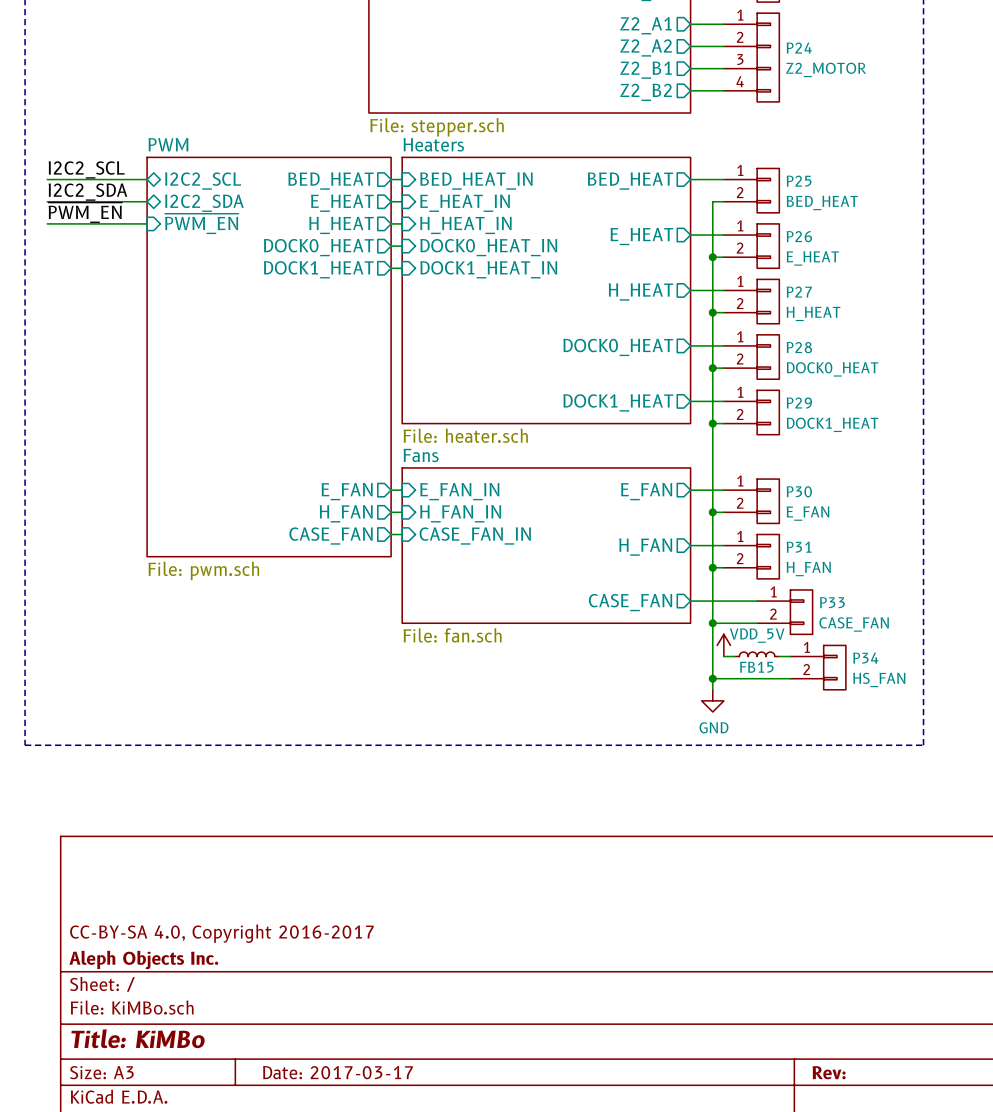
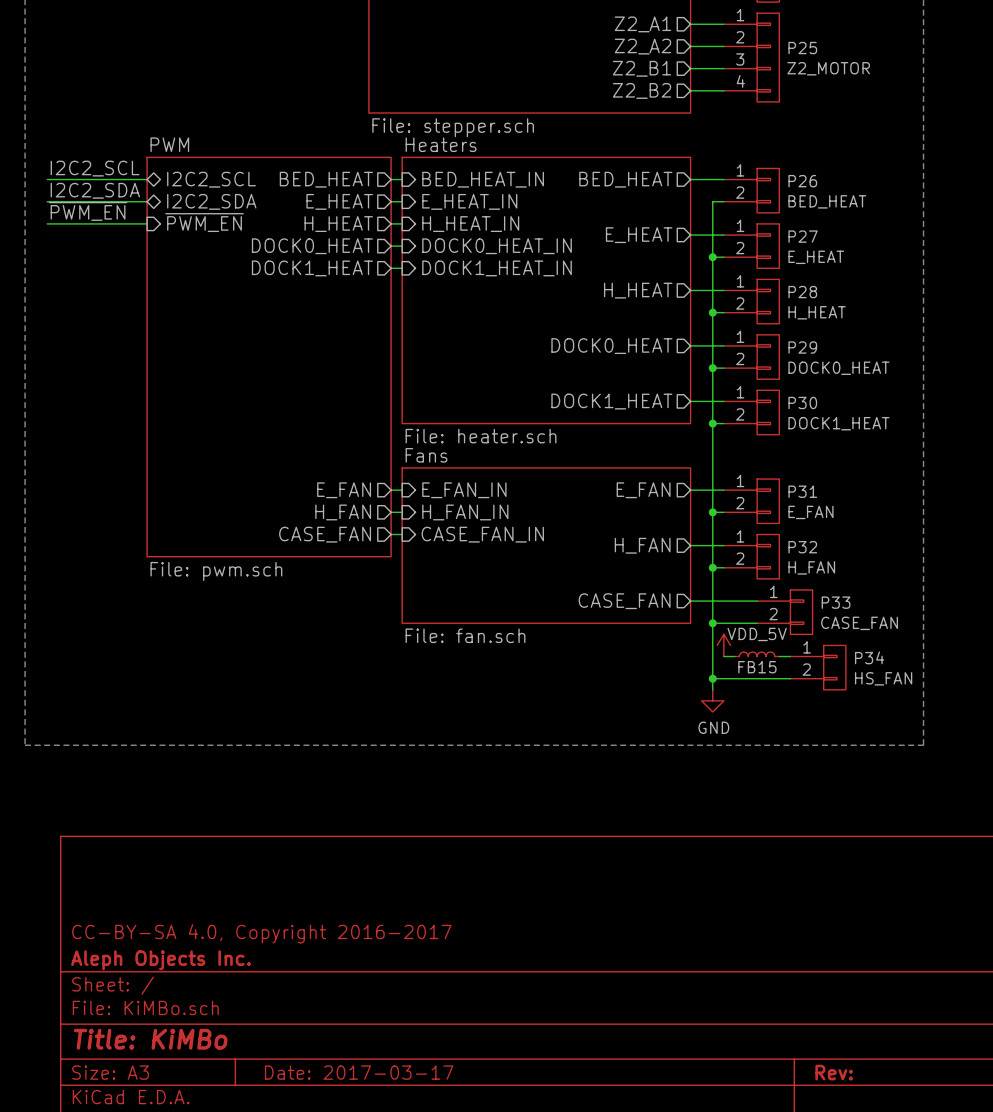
P24 name: P24 (799, 48) -> P25 (802, 48)
P25 name: P25 (799, 181) -> P26 (802, 181)
P26 name: P26 (799, 236) -> P27 (803, 236)
P27 name: P27 (799, 292) -> P28 (802, 292)
P28 name: P28 (799, 347) -> P29 (802, 347)
P29 name: P29 (799, 403) -> P30 (802, 402)
P30 name: P30 (799, 491) -> P31 (802, 491)
P31 name: P31 (799, 547) -> P32 (802, 547)

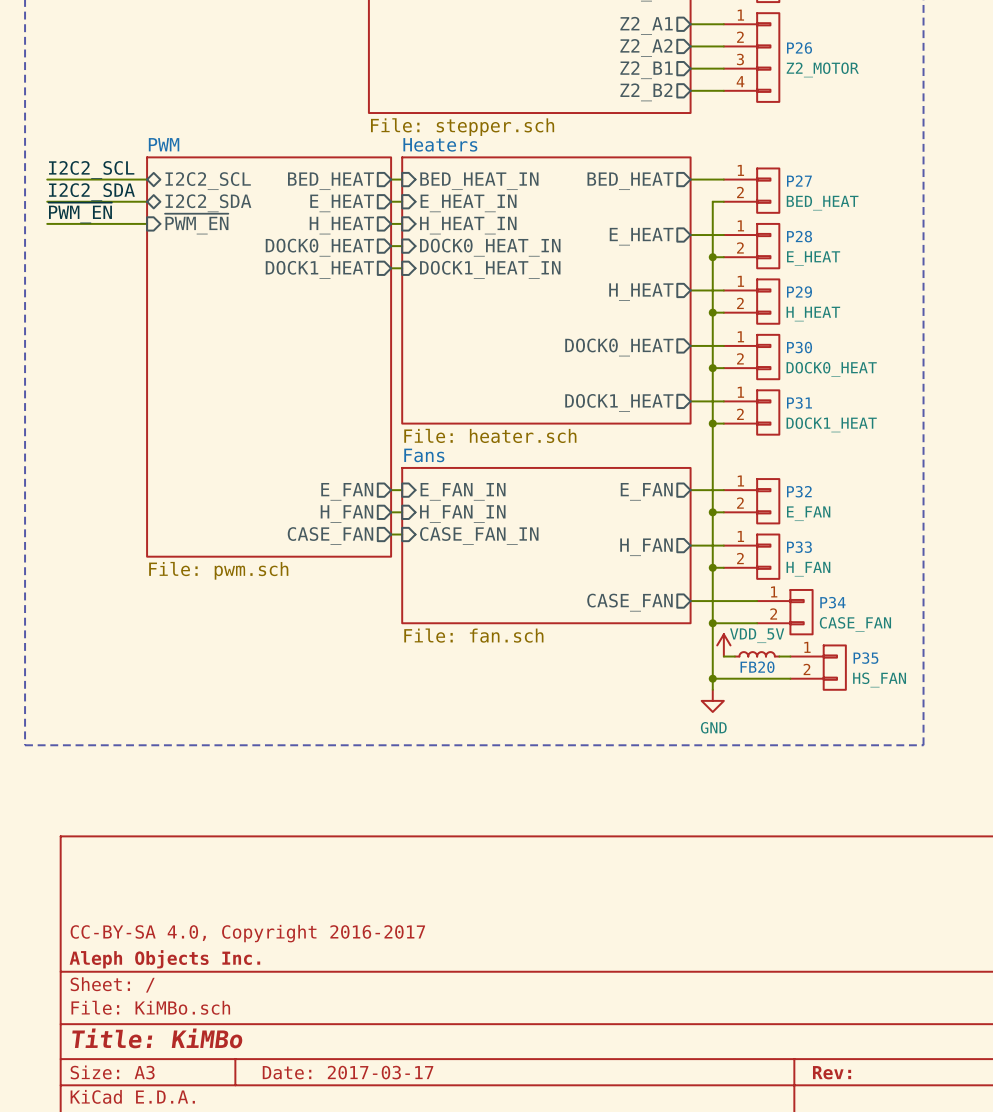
P25 name: P25 (802, 48) -> P26 (799, 48)
P26 name: P26 (802, 181) -> P27 (799, 181)
P27 name: P27 (803, 236) -> P28 (799, 236)
P28 name: P28 (802, 292) -> P29 (799, 292)
P29 name: P29 (802, 347) -> P30 (799, 347)
P30 name: P30 (802, 402) -> P31 (799, 402)
P31 name: P31 (802, 491) -> P32 (799, 491)
P32 name: P32 (802, 547) -> P33 (799, 547)
P33 name: P33 (836, 602) -> P34 (832, 602)
P34 name: P34 (869, 657) -> P35 (865, 658)
FB15 name: FB15 (757, 667) -> FB20 (757, 667)

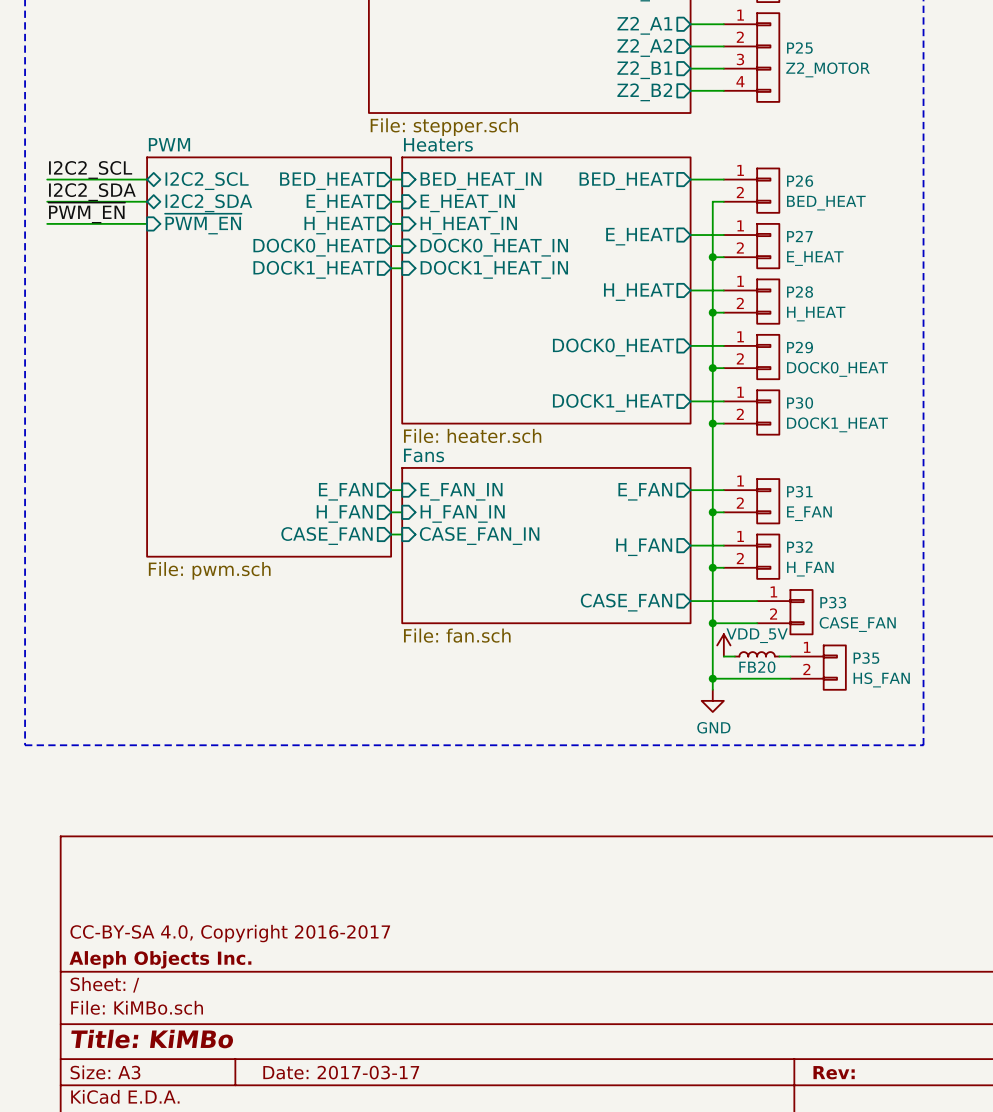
P26 name: P26 (799, 48) -> P25 (799, 48)
P27 name: P27 (799, 181) -> P26 (800, 181)
P28 name: P28 (799, 236) -> P27 (799, 236)
P29 name: P29 (799, 292) -> P28 (800, 292)
P30 name: P30 (799, 347) -> P29 (800, 347)
P31 name: P31 (799, 402) -> P30 (800, 402)
P32 name: P32 (799, 491) -> P31 (799, 491)
P33 name: P33 (799, 547) -> P32 (799, 547)
P34 name: P34 (832, 602) -> P33 (833, 602)

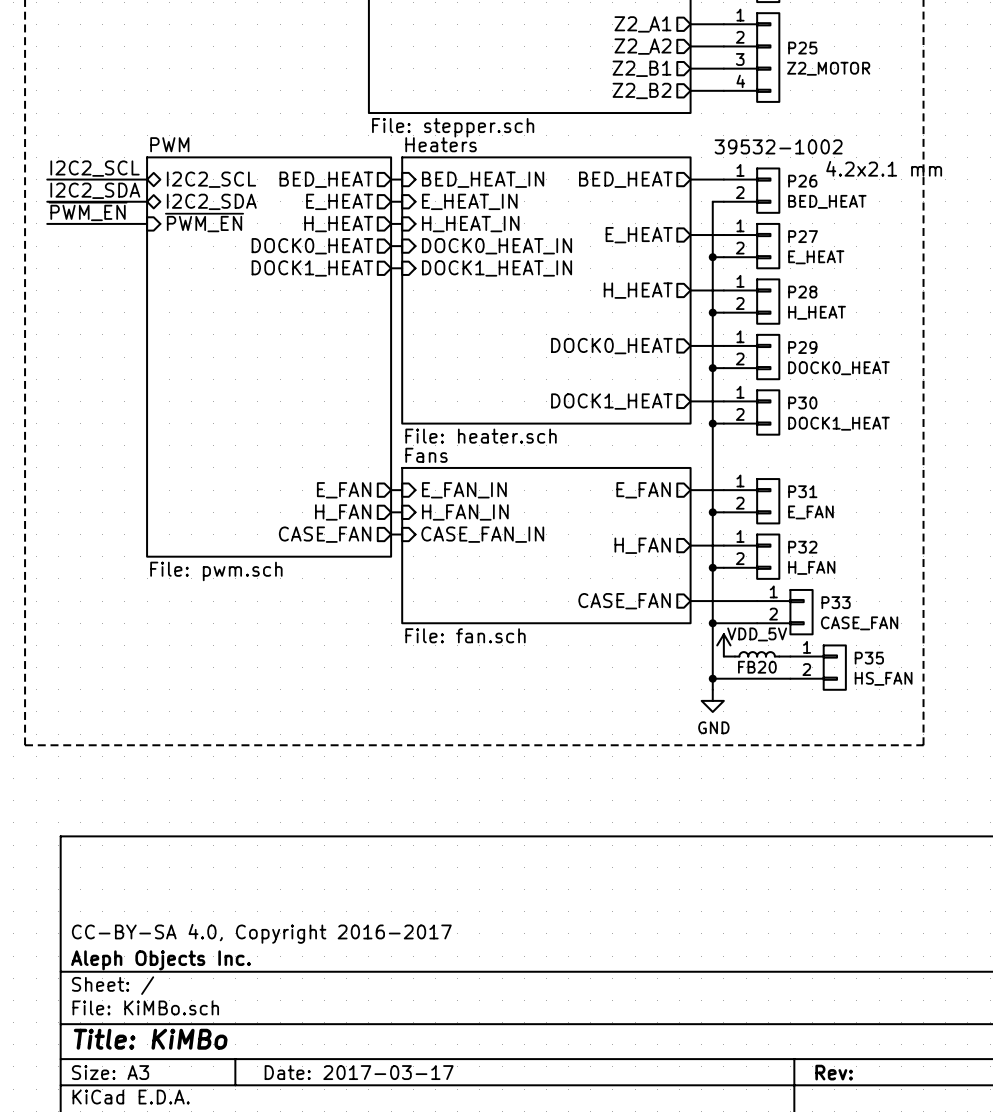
text: none -> 39532-1002 (778, 146)
text: none -> 4.2x2.1 mm (884, 168)

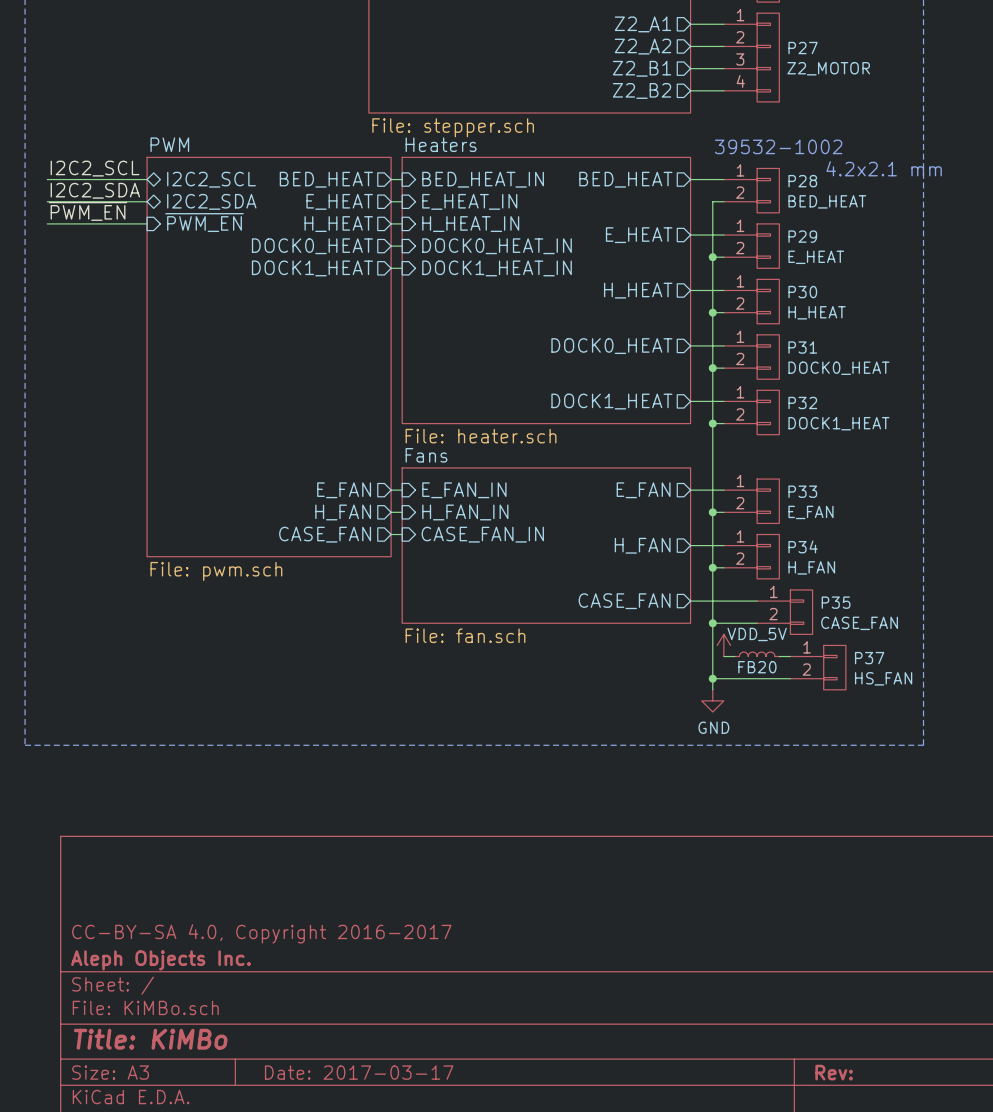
P25 name: P25 (802, 48) -> P27 (803, 48)
P26 name: P26 (802, 181) -> P28 (802, 181)
P27 name: P27 (803, 236) -> P29 (802, 236)
P28 name: P28 (802, 292) -> P30 (802, 292)
P29 name: P29 (802, 347) -> P31 (802, 347)
P30 name: P30 (802, 402) -> P32 (802, 402)
P31 name: P31 (802, 491) -> P33 (802, 491)
P32 name: P32 (802, 547) -> P34 (803, 546)
P33 name: P33 (836, 602) -> P35 (836, 602)
P35 name: P35 (869, 658) -> P37 (869, 658)

